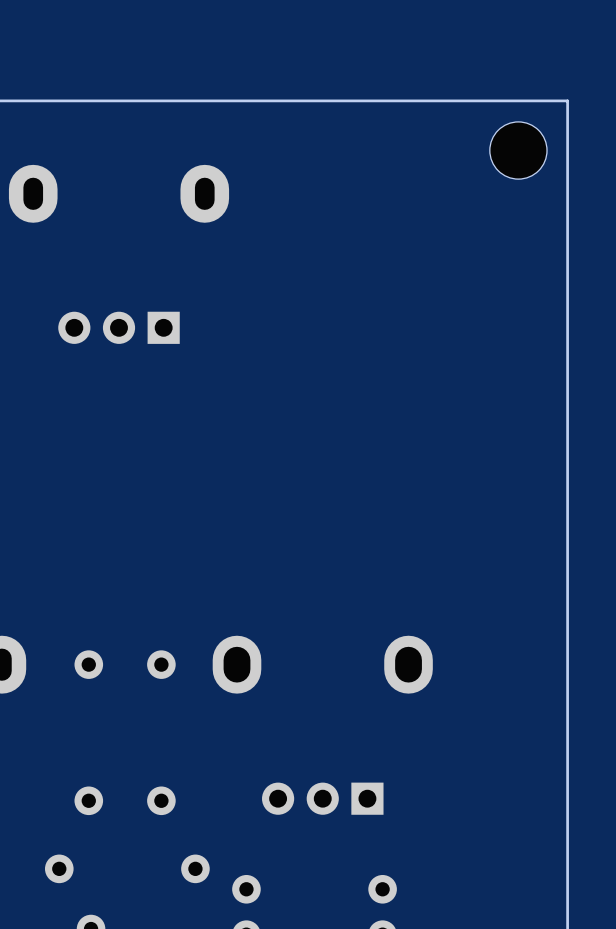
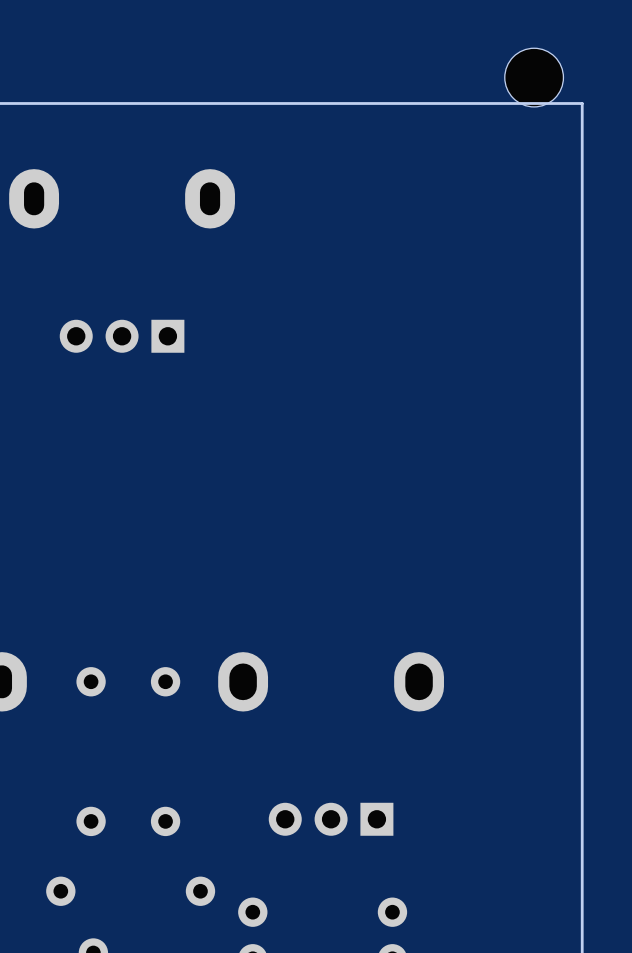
part position: (518, 150) -> (534, 77)

